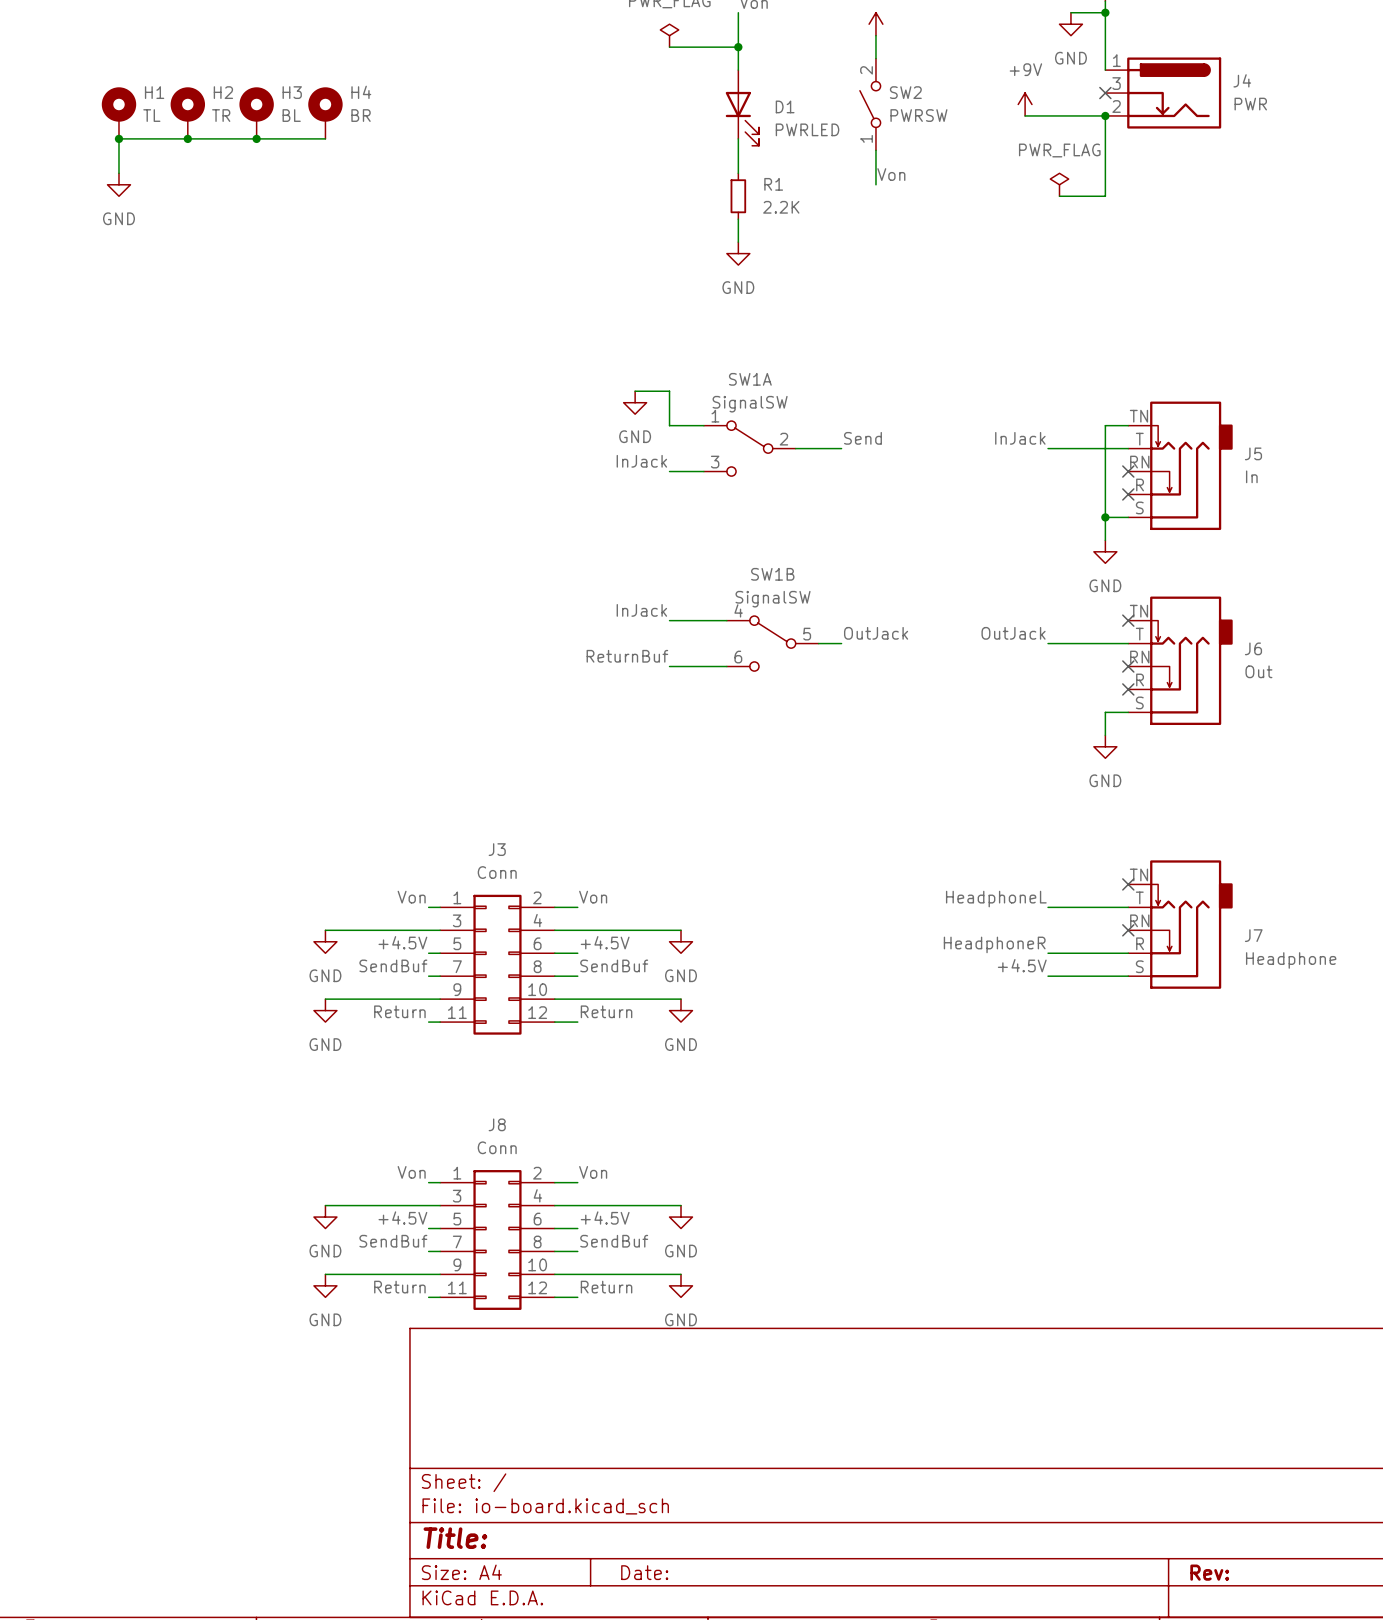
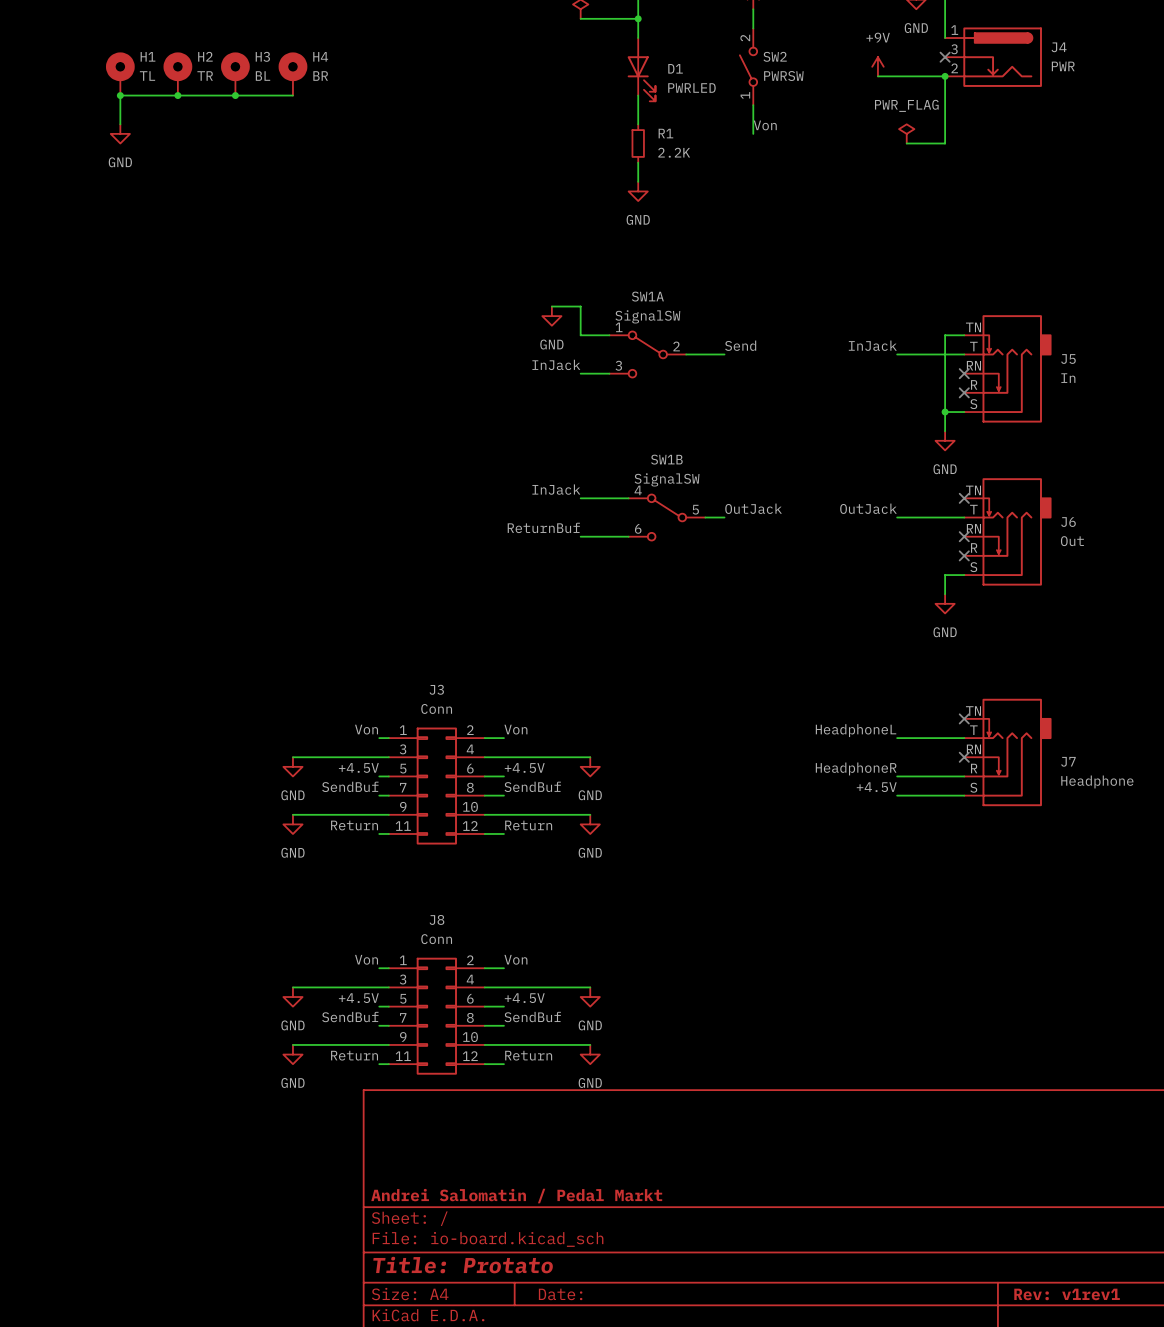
title block: none -> Andrei Salomatin / Pedal Markt (516, 1196)
title block: Title: (455, 1538) -> Title: Protato (463, 1265)
title block: Rev: (1209, 1572) -> Rev: v1rev1 (1067, 1294)

